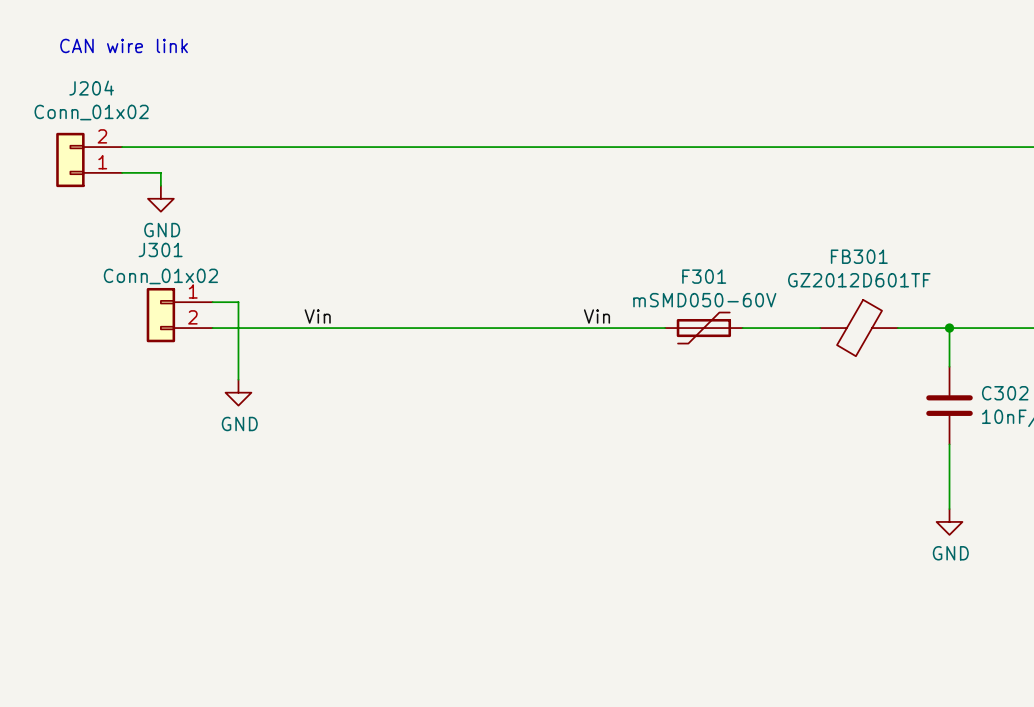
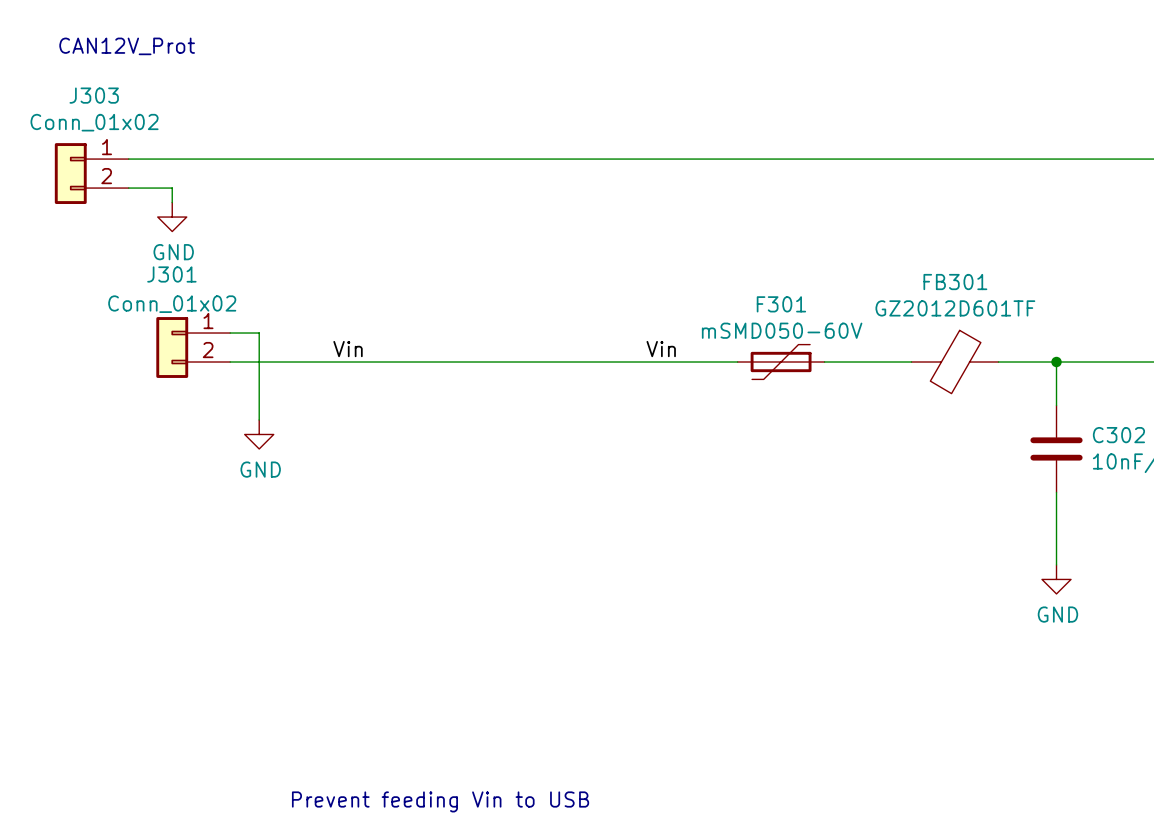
text: CAN wire link (124, 45) -> CAN12V_Prot (127, 46)
J204 name: J204 (91, 88) -> J303 (94, 95)
J204 flip: as is (70, 159) -> up-down (70, 173)

